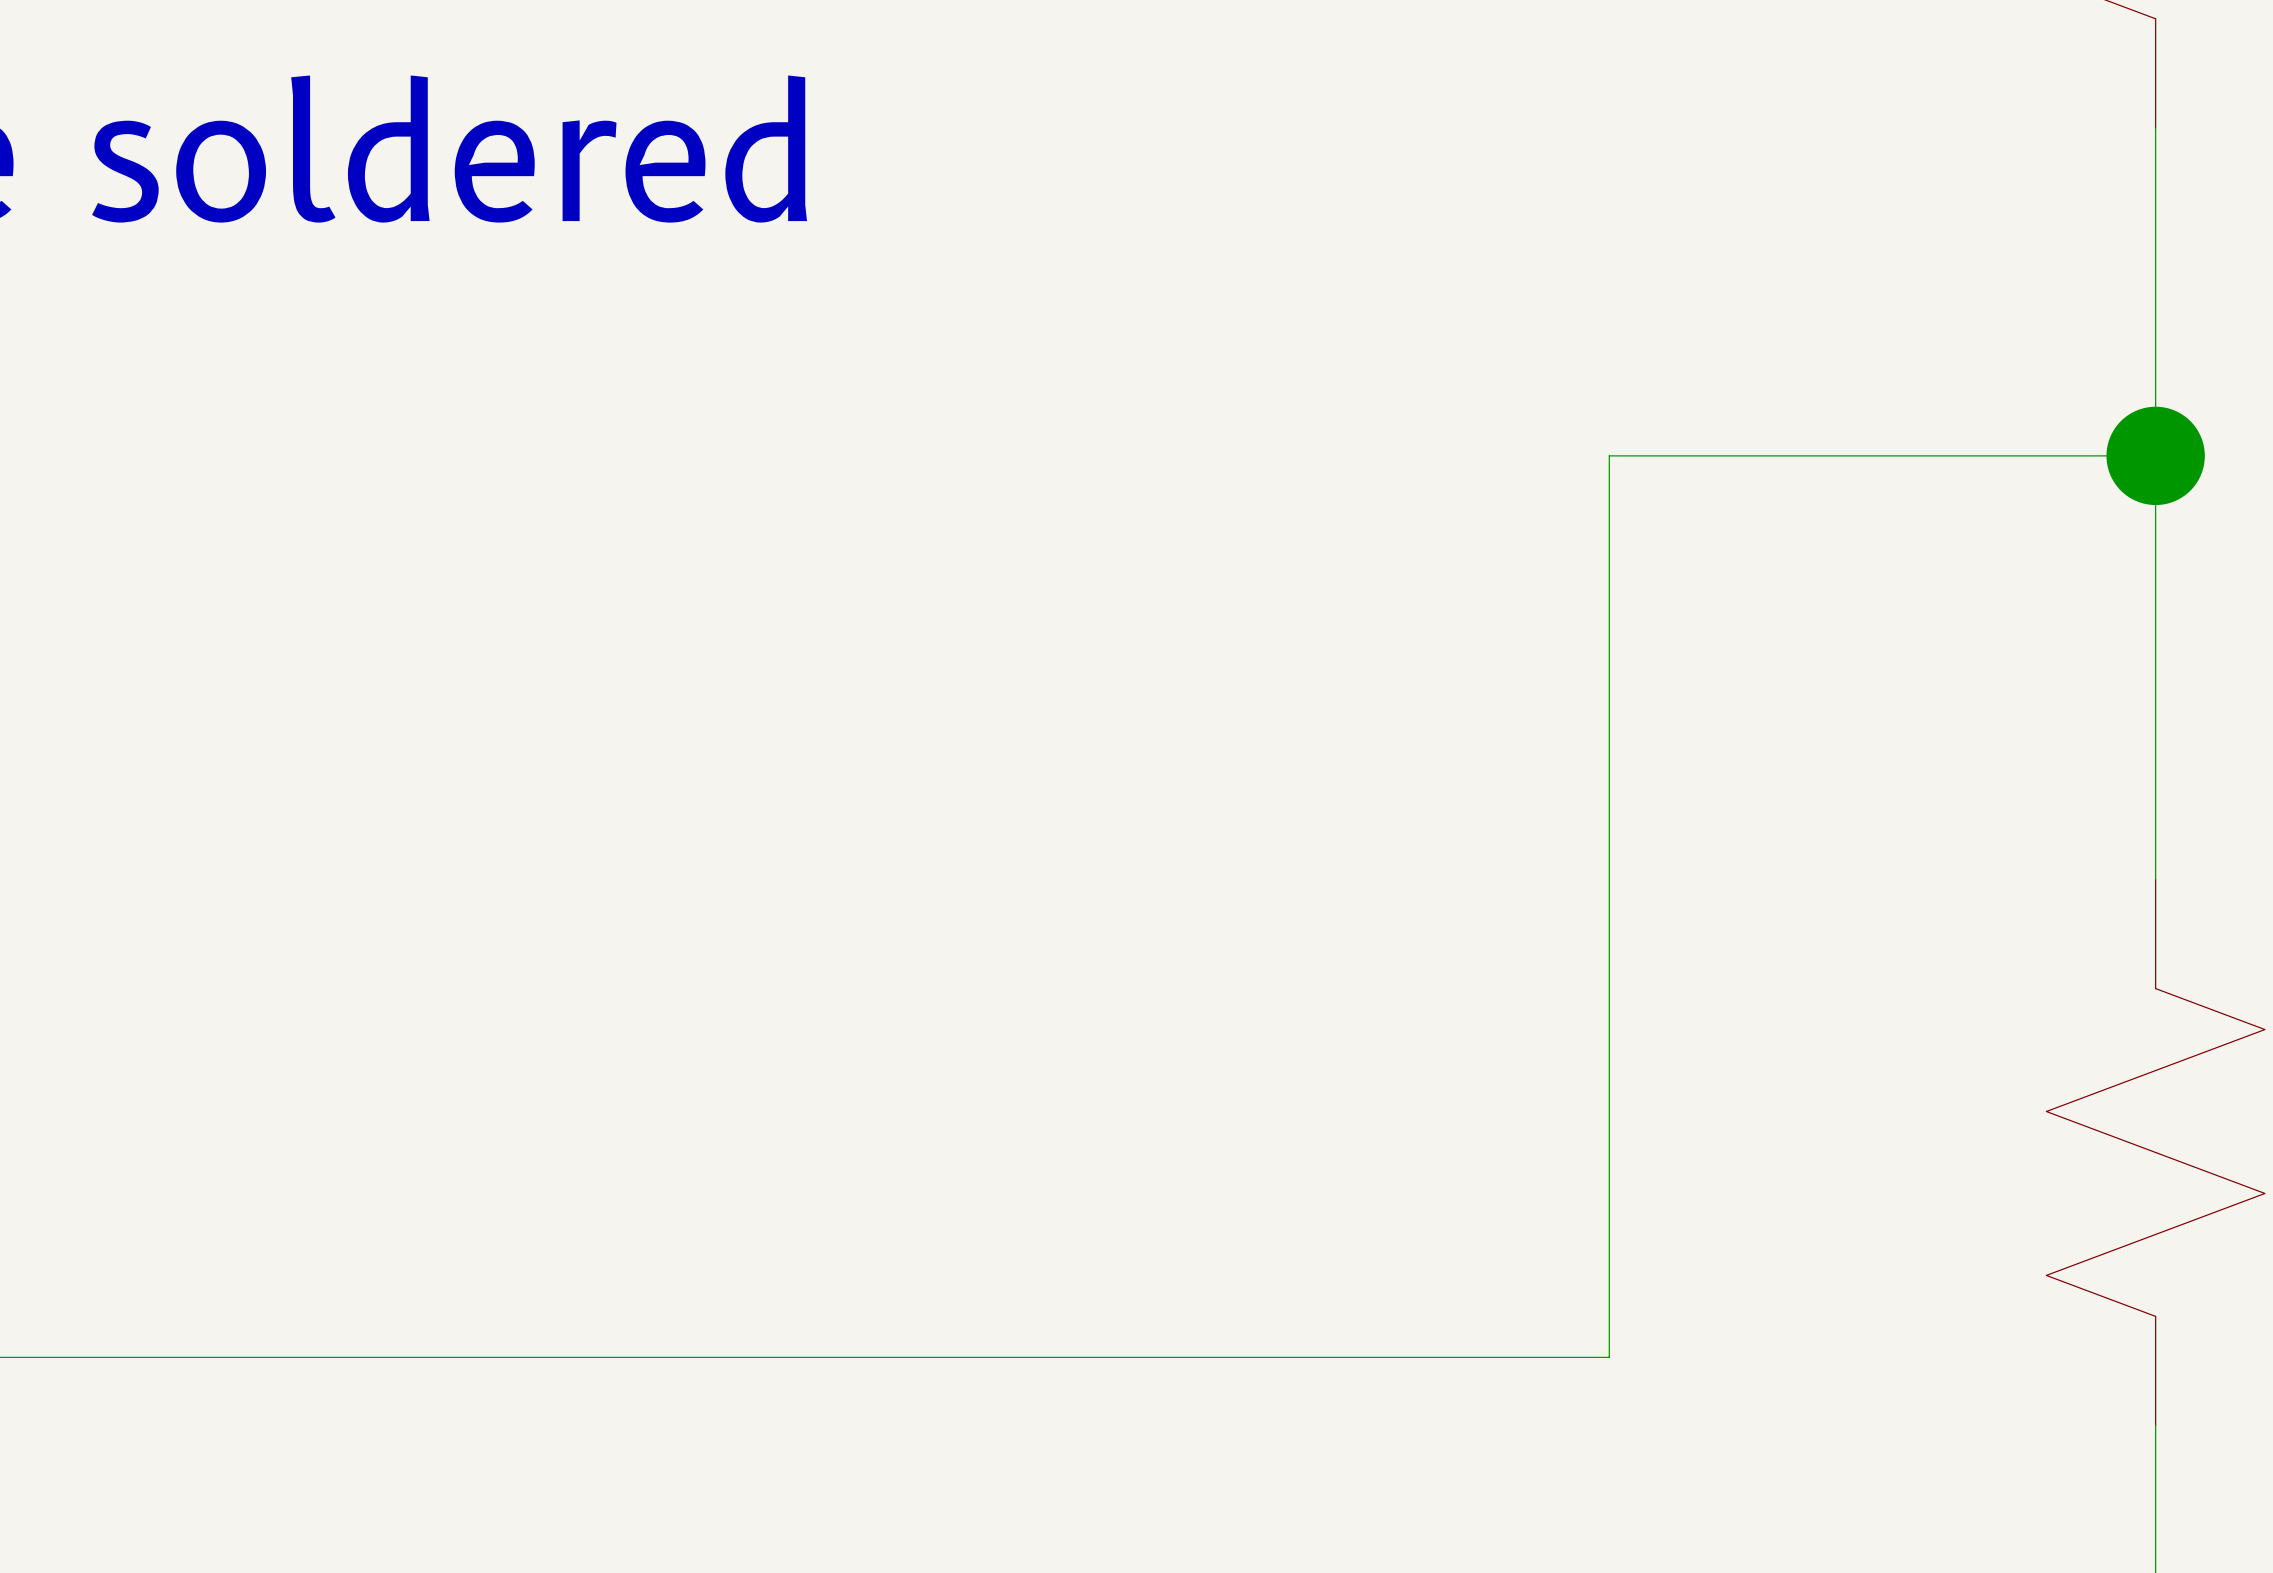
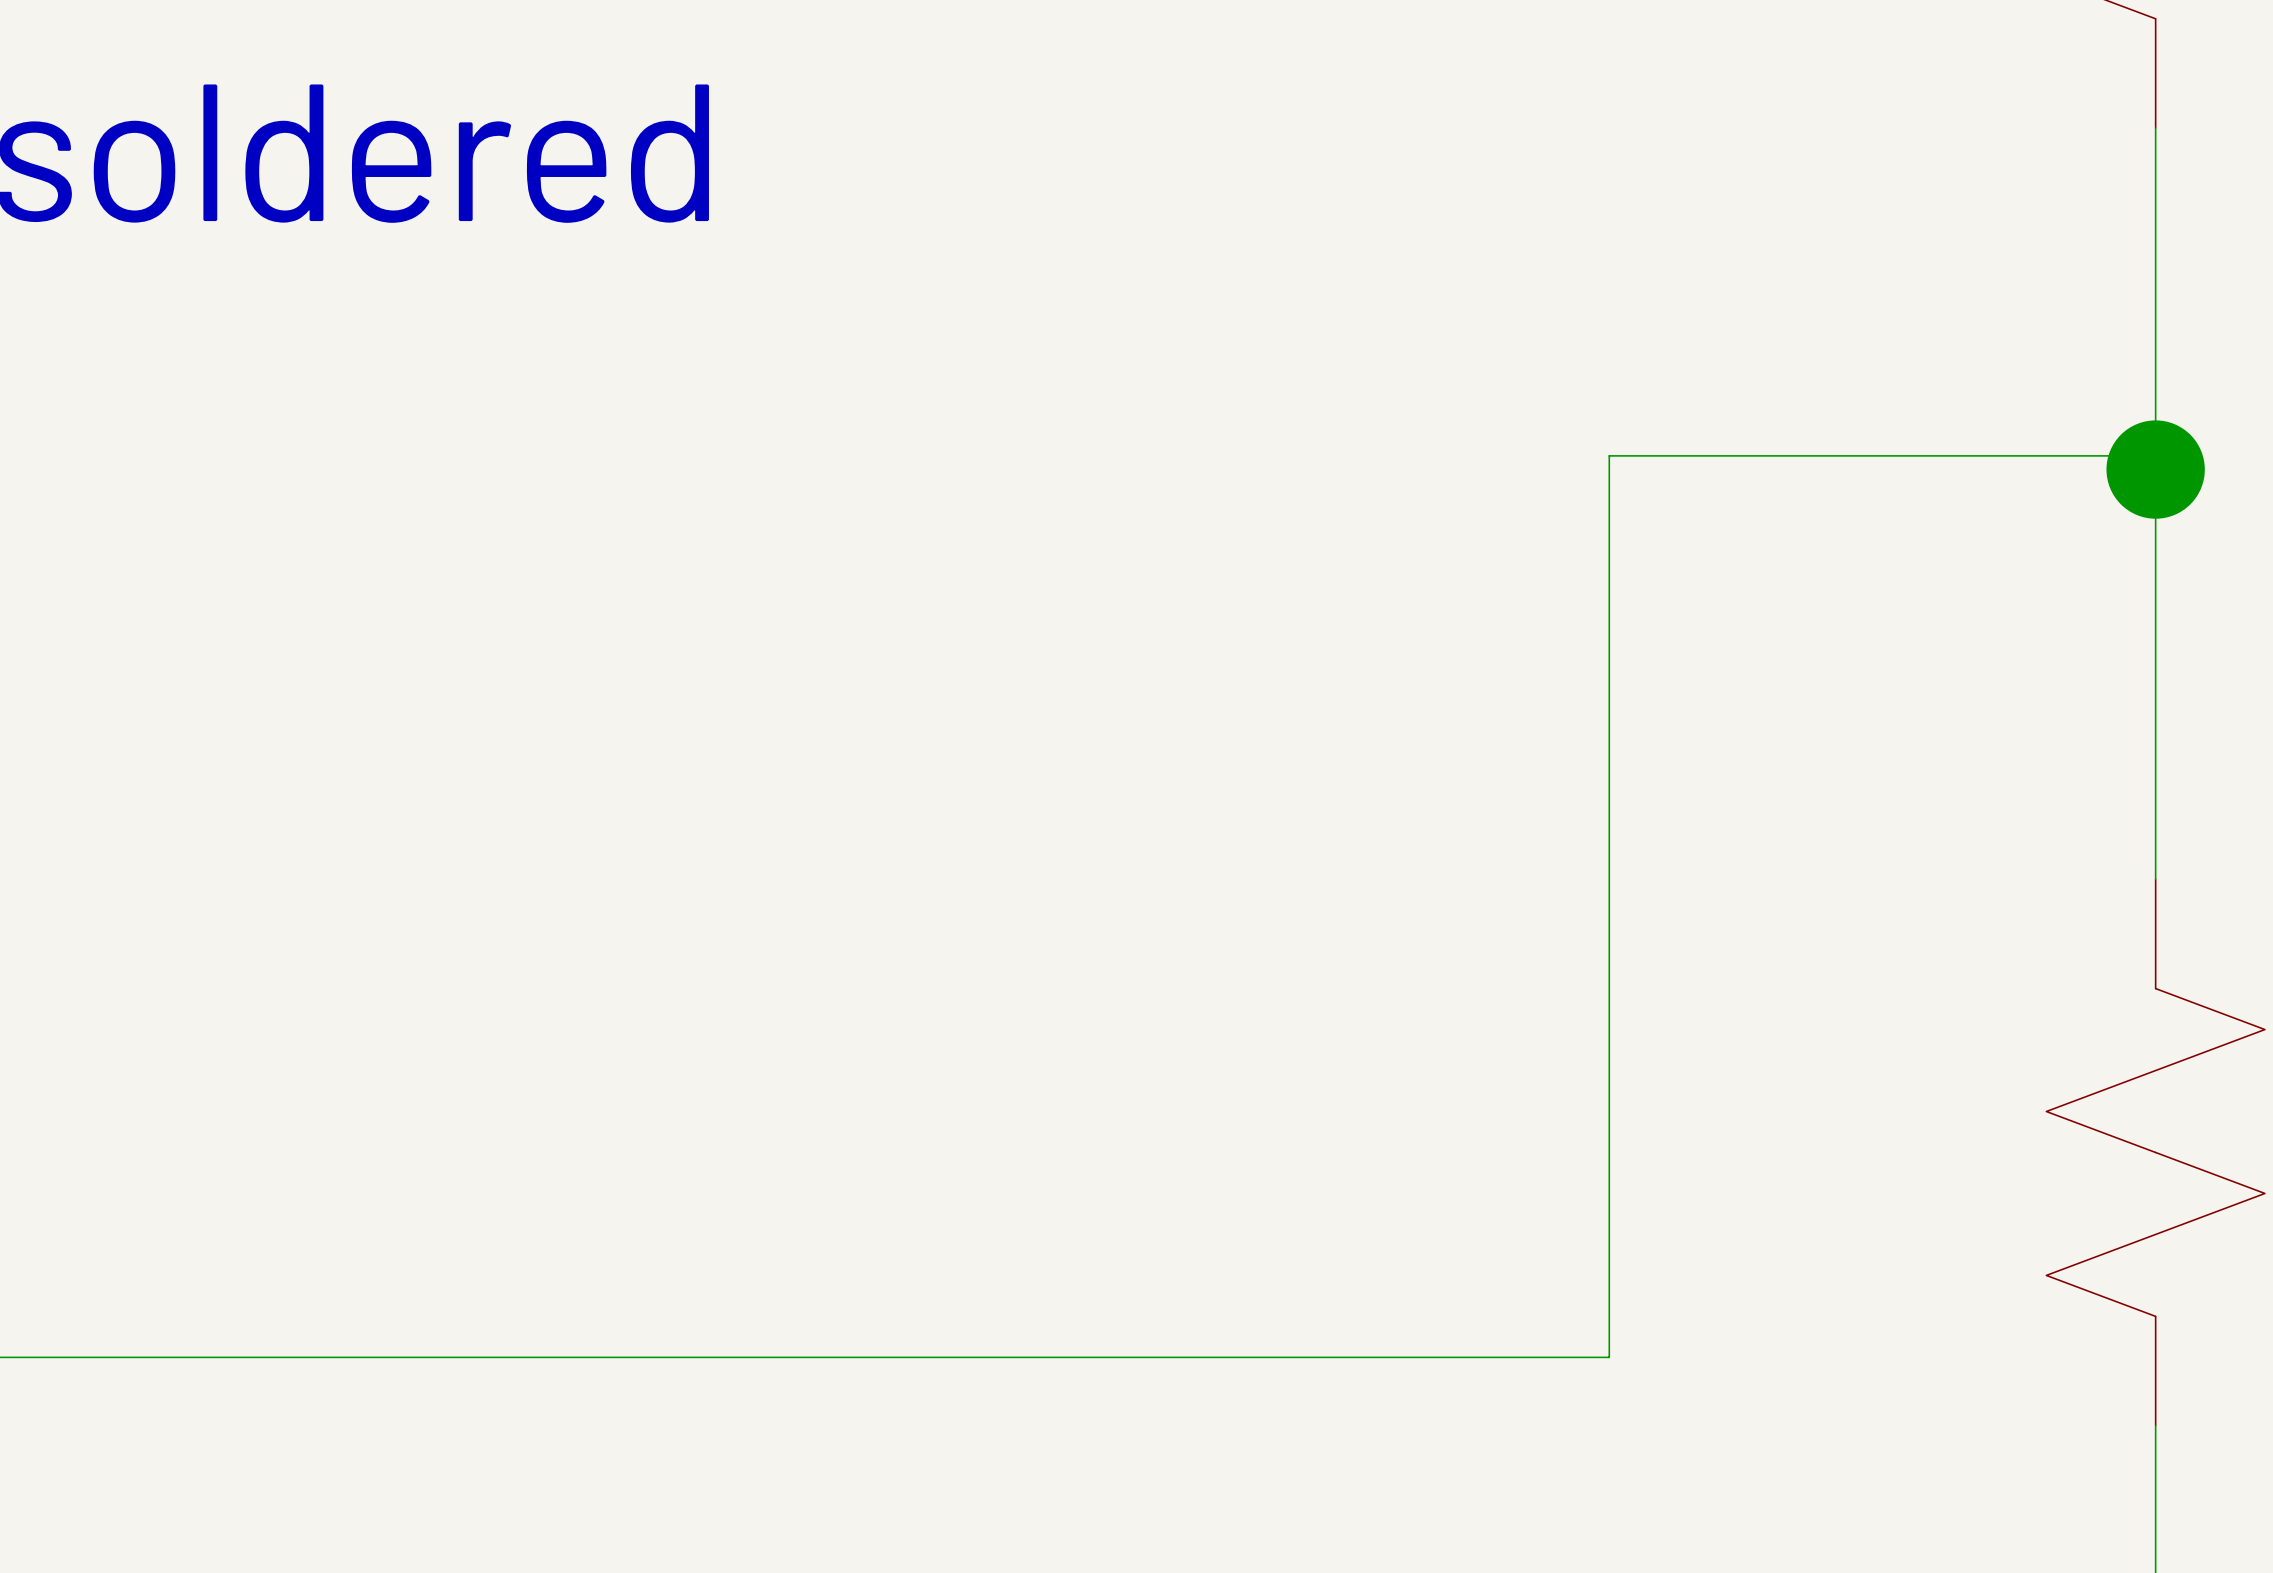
junction position: (2155, 455) -> (2155, 469)

